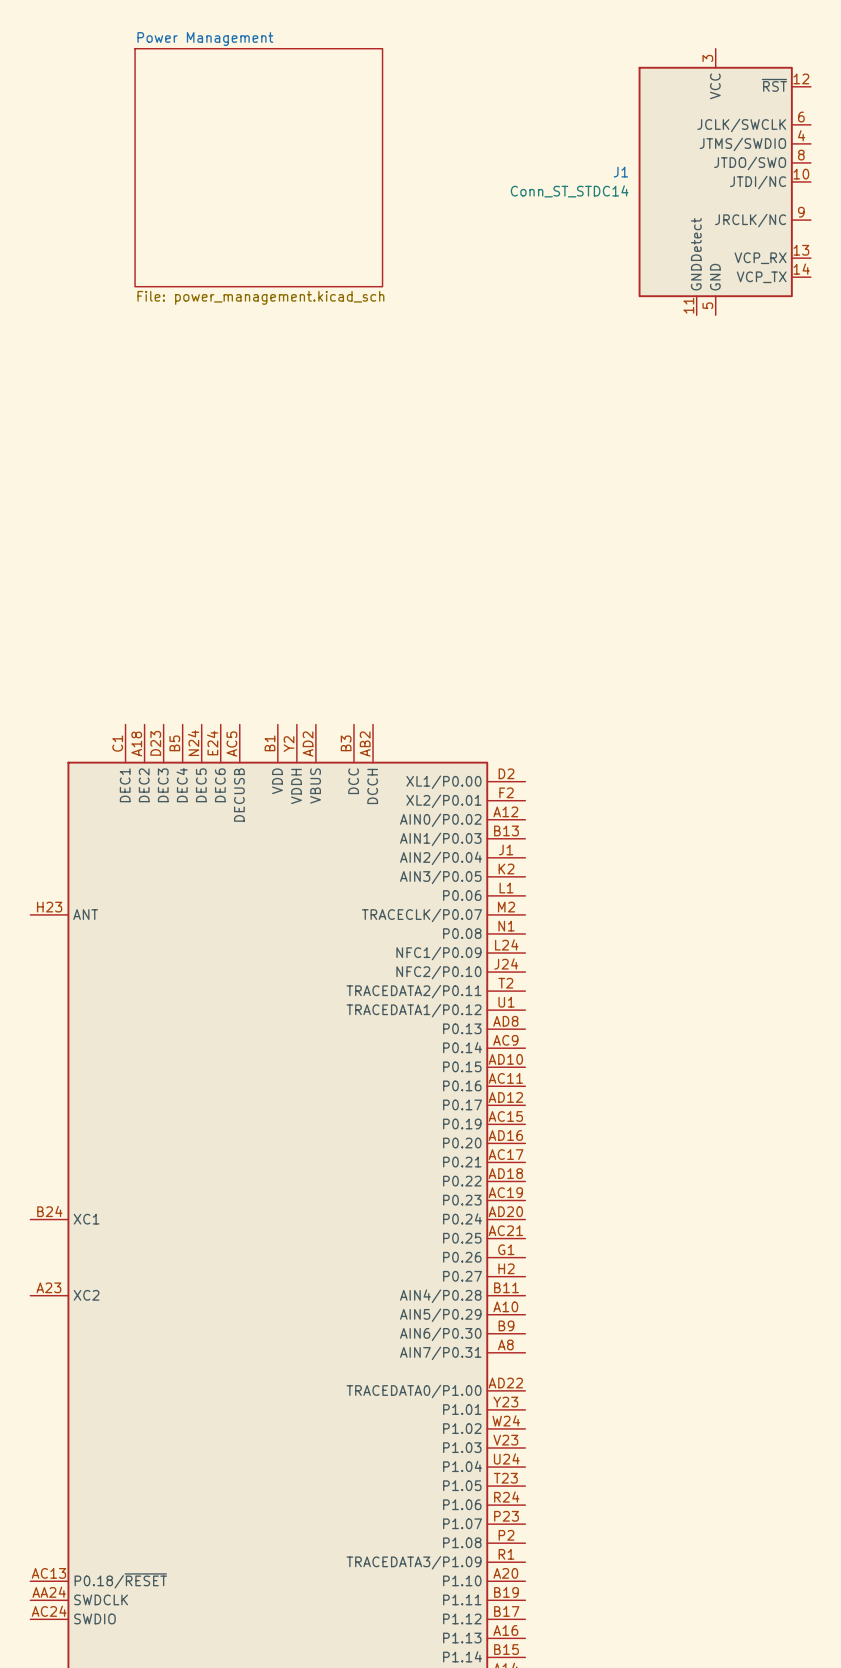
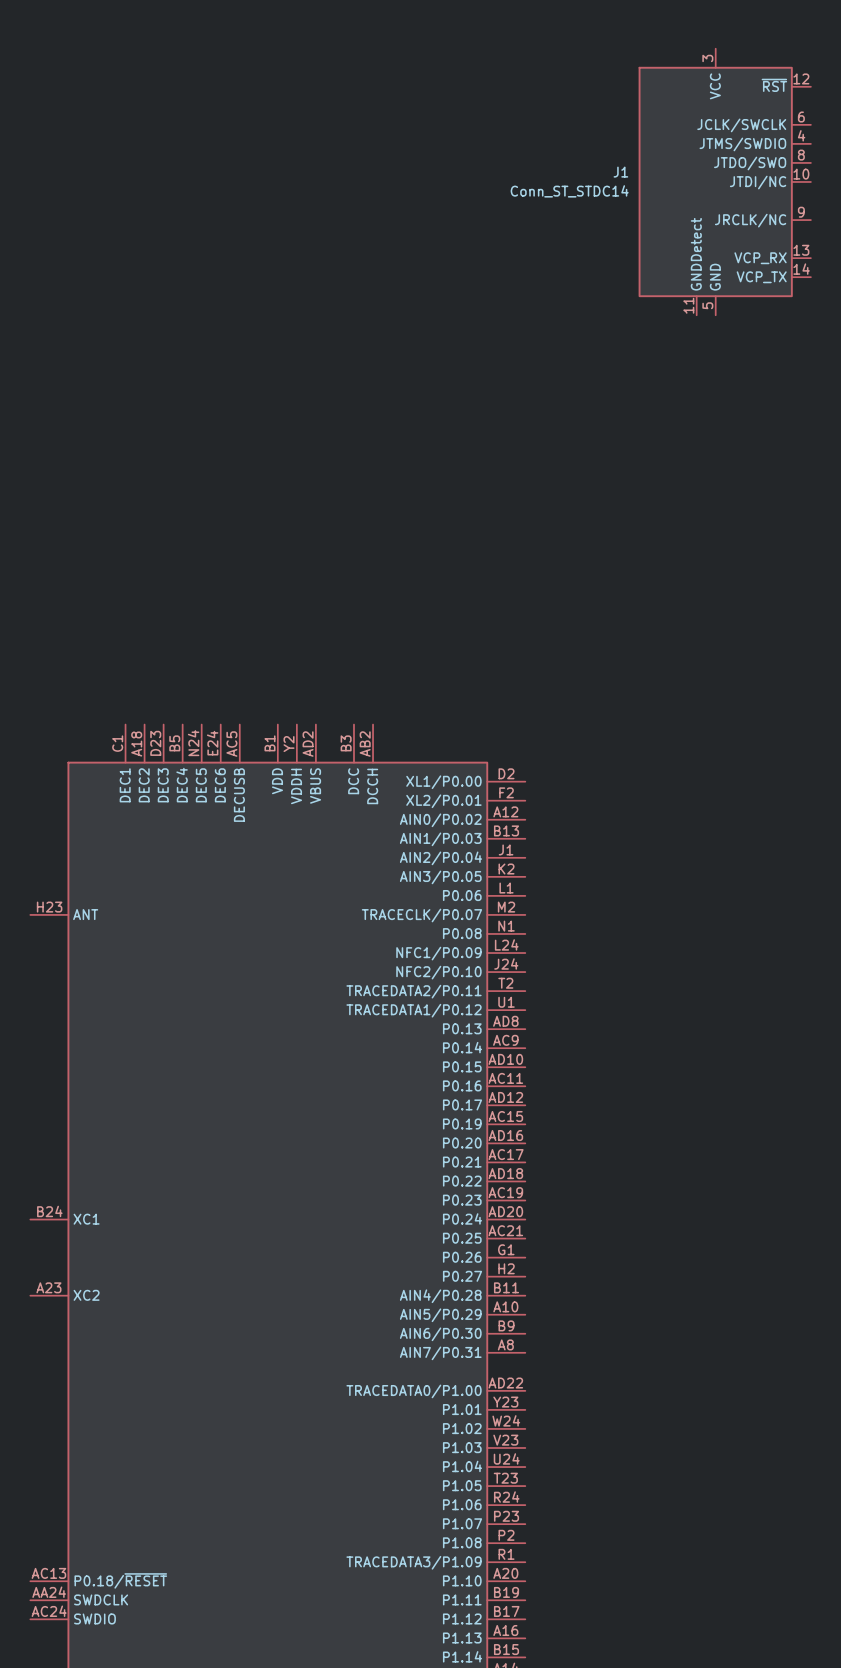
sheet Power Management: File: power_management.kicad_sch (258, 167) -> none

